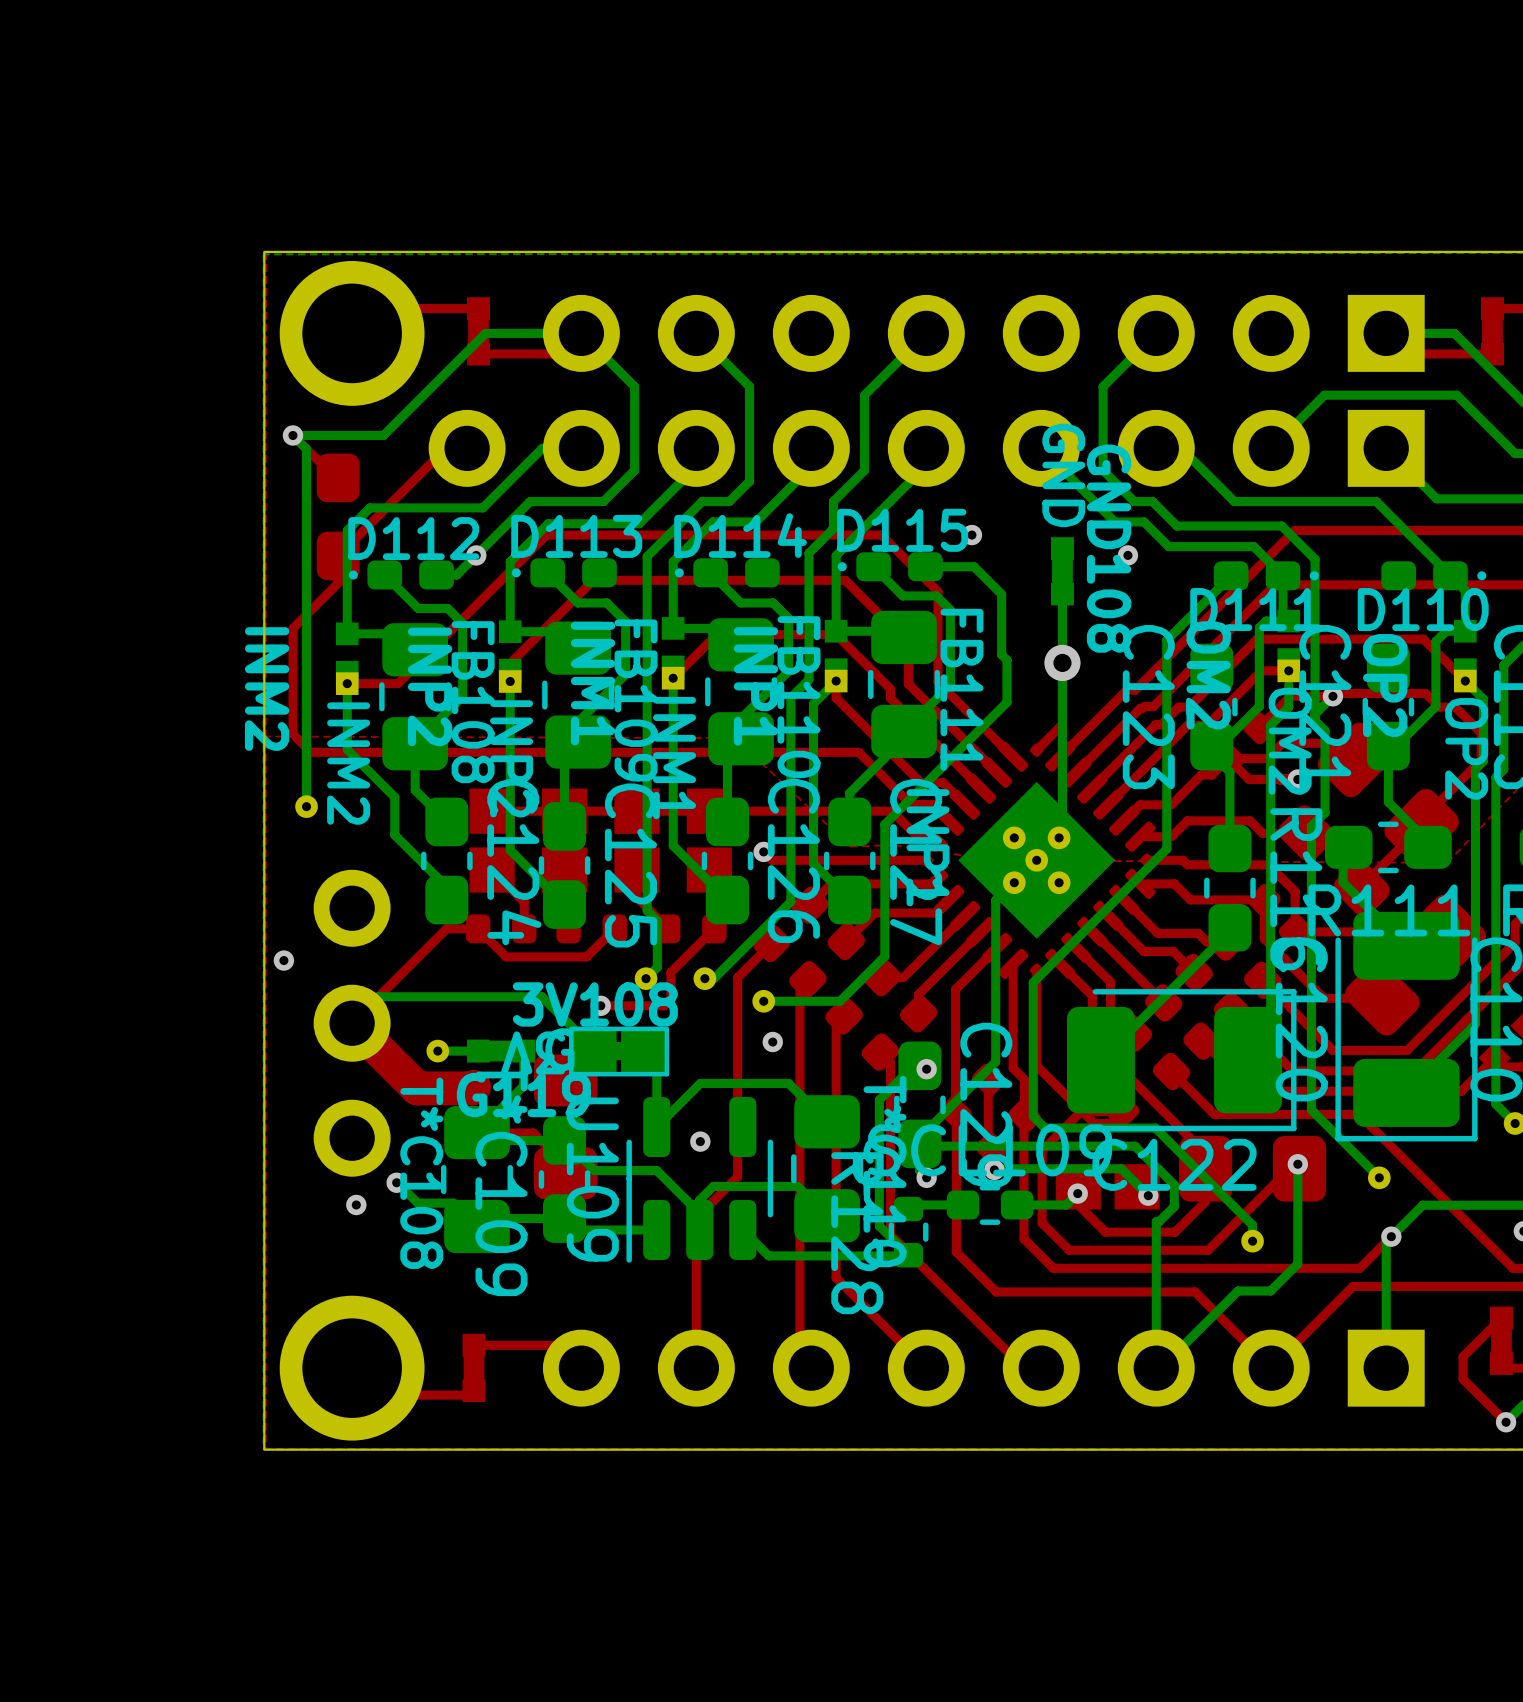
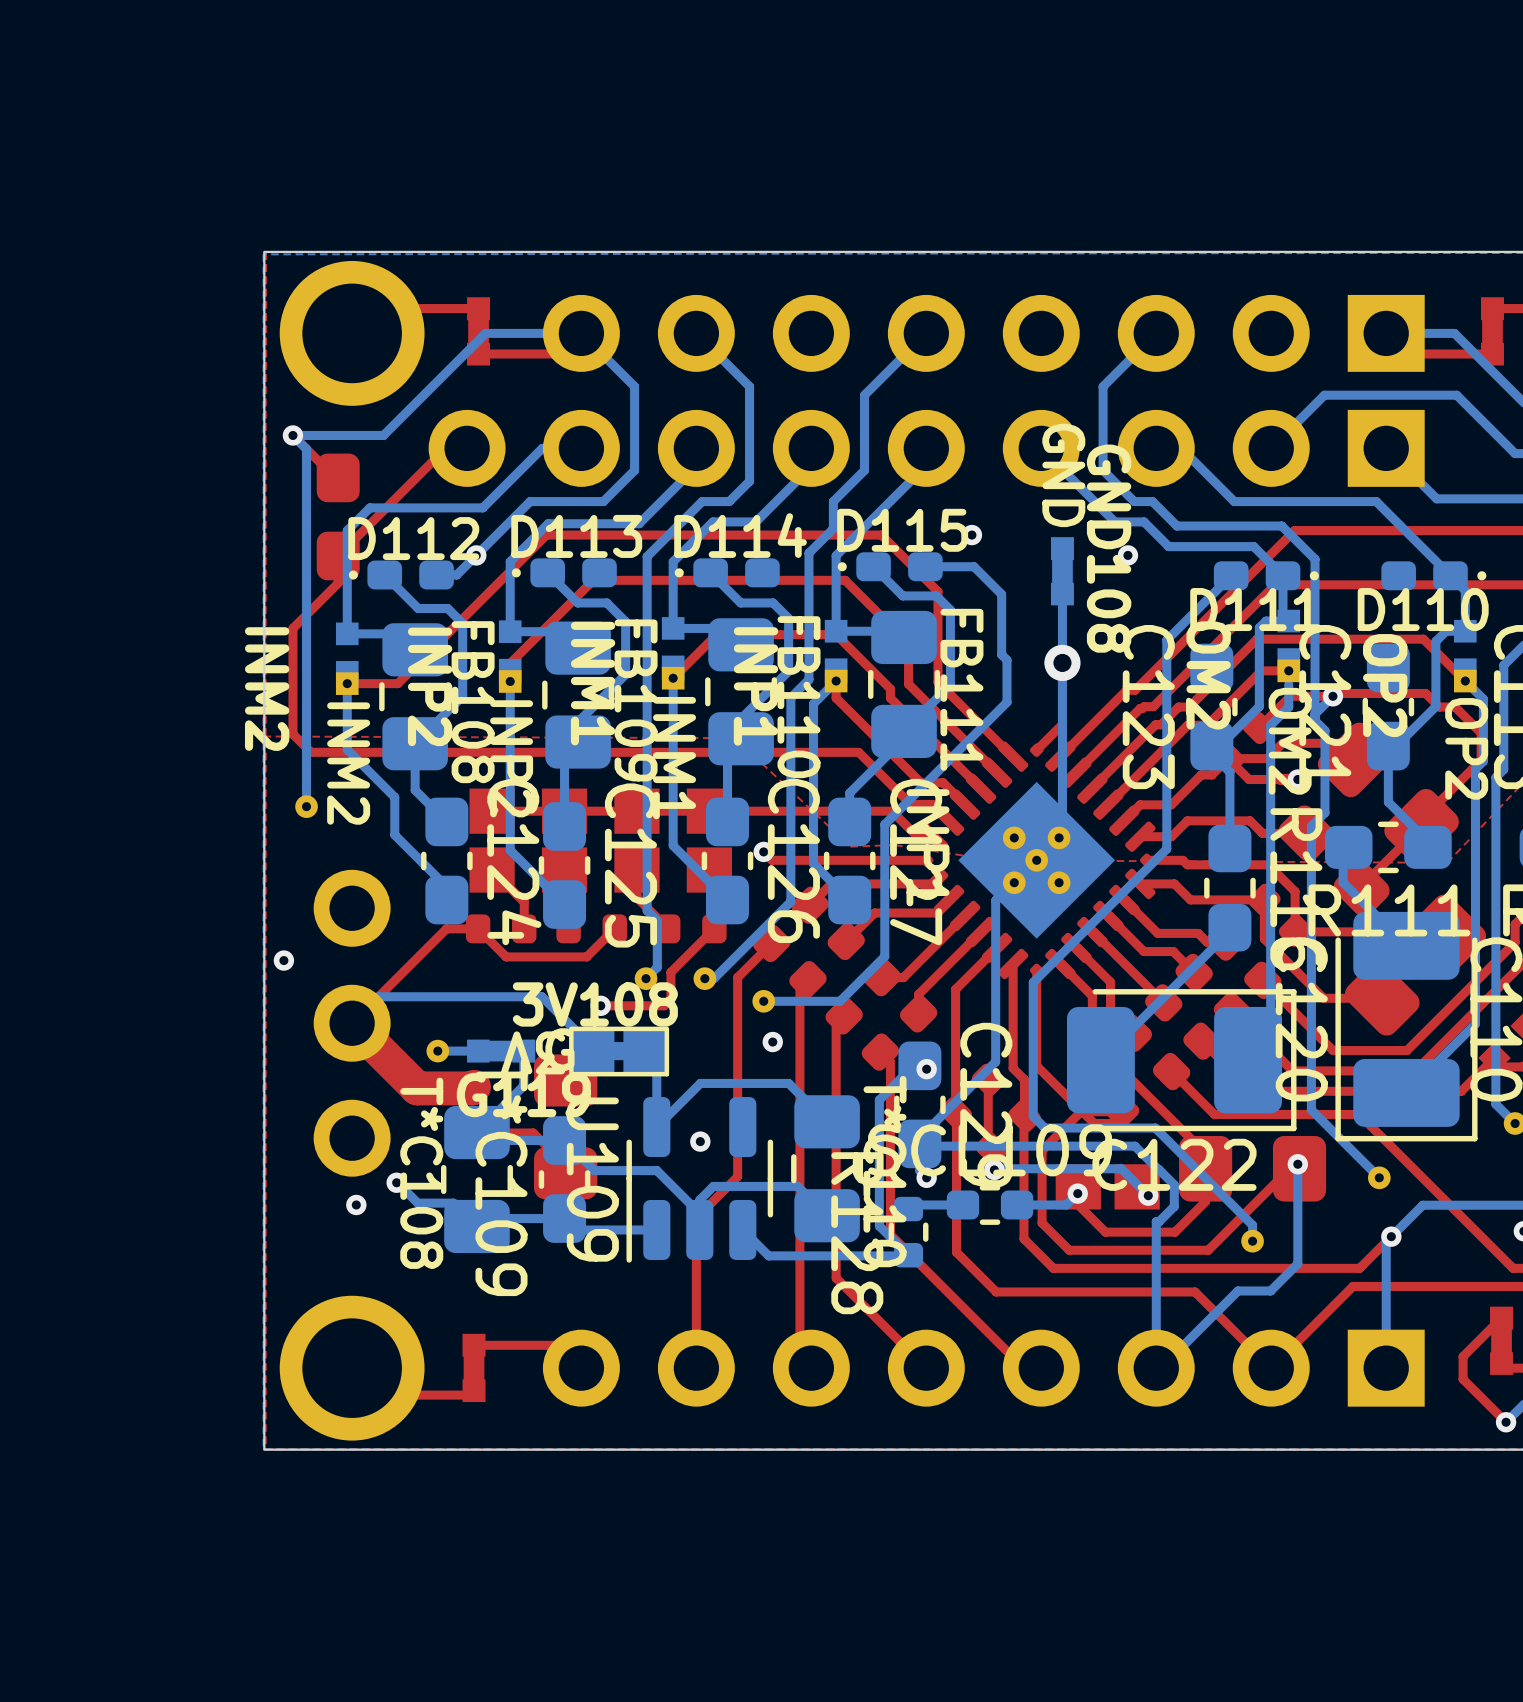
3V108 footprint: [569, 1026, 670, 1077] -> [569, 1026, 670, 1077]

